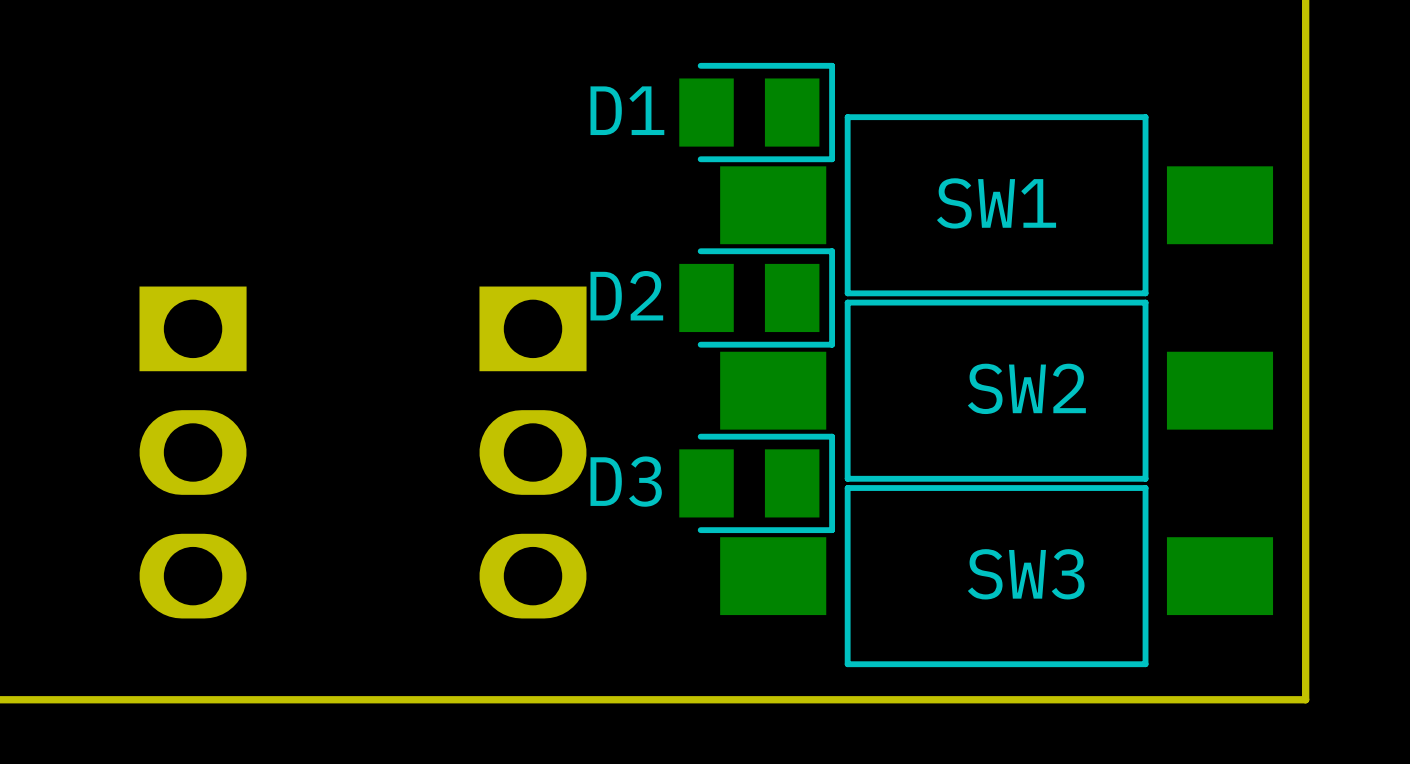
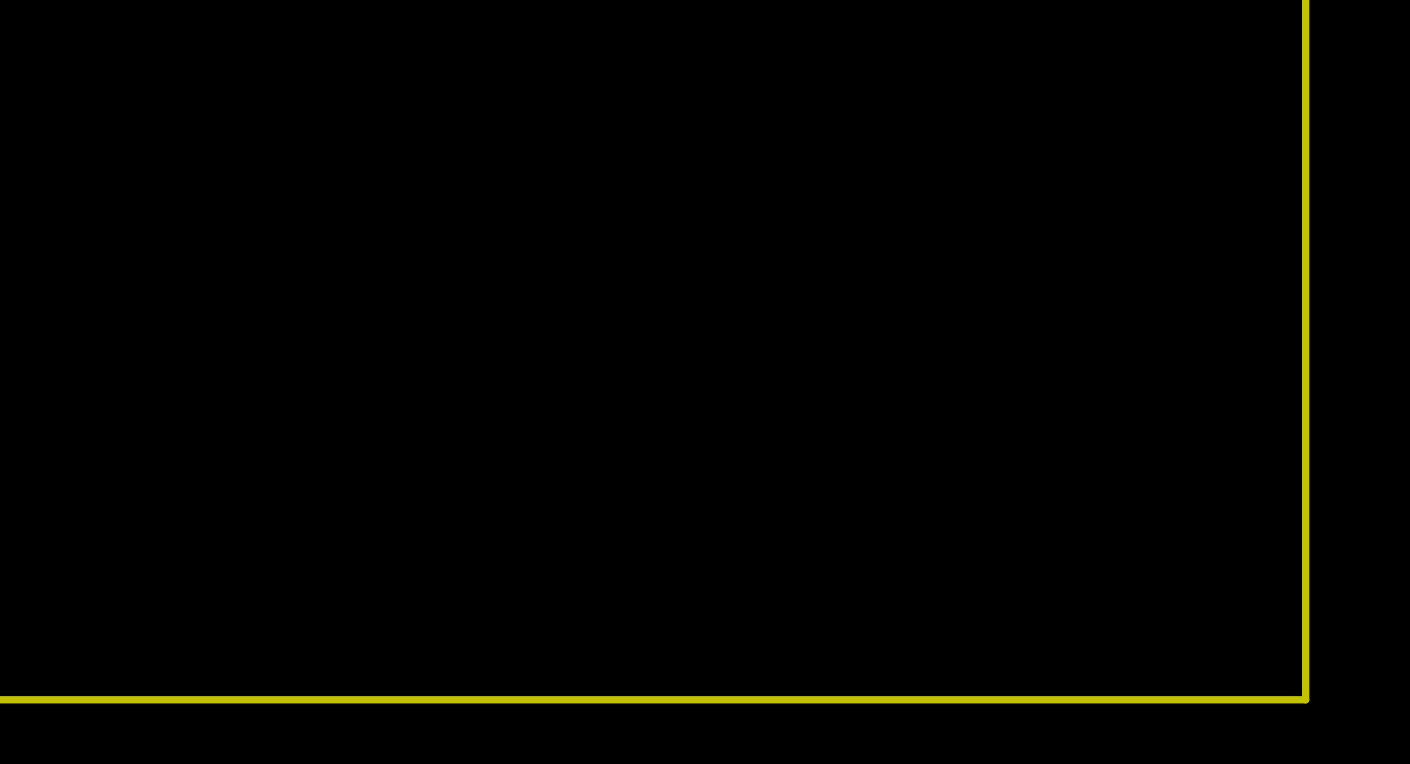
D1: (757, 112) -> none
SW1: (996, 205) -> none
D2: (757, 297) -> none
SW2: (996, 390) -> none
part: (193, 452) -> none
part: (533, 452) -> none
D3: (757, 483) -> none
SW3: (996, 576) -> none

